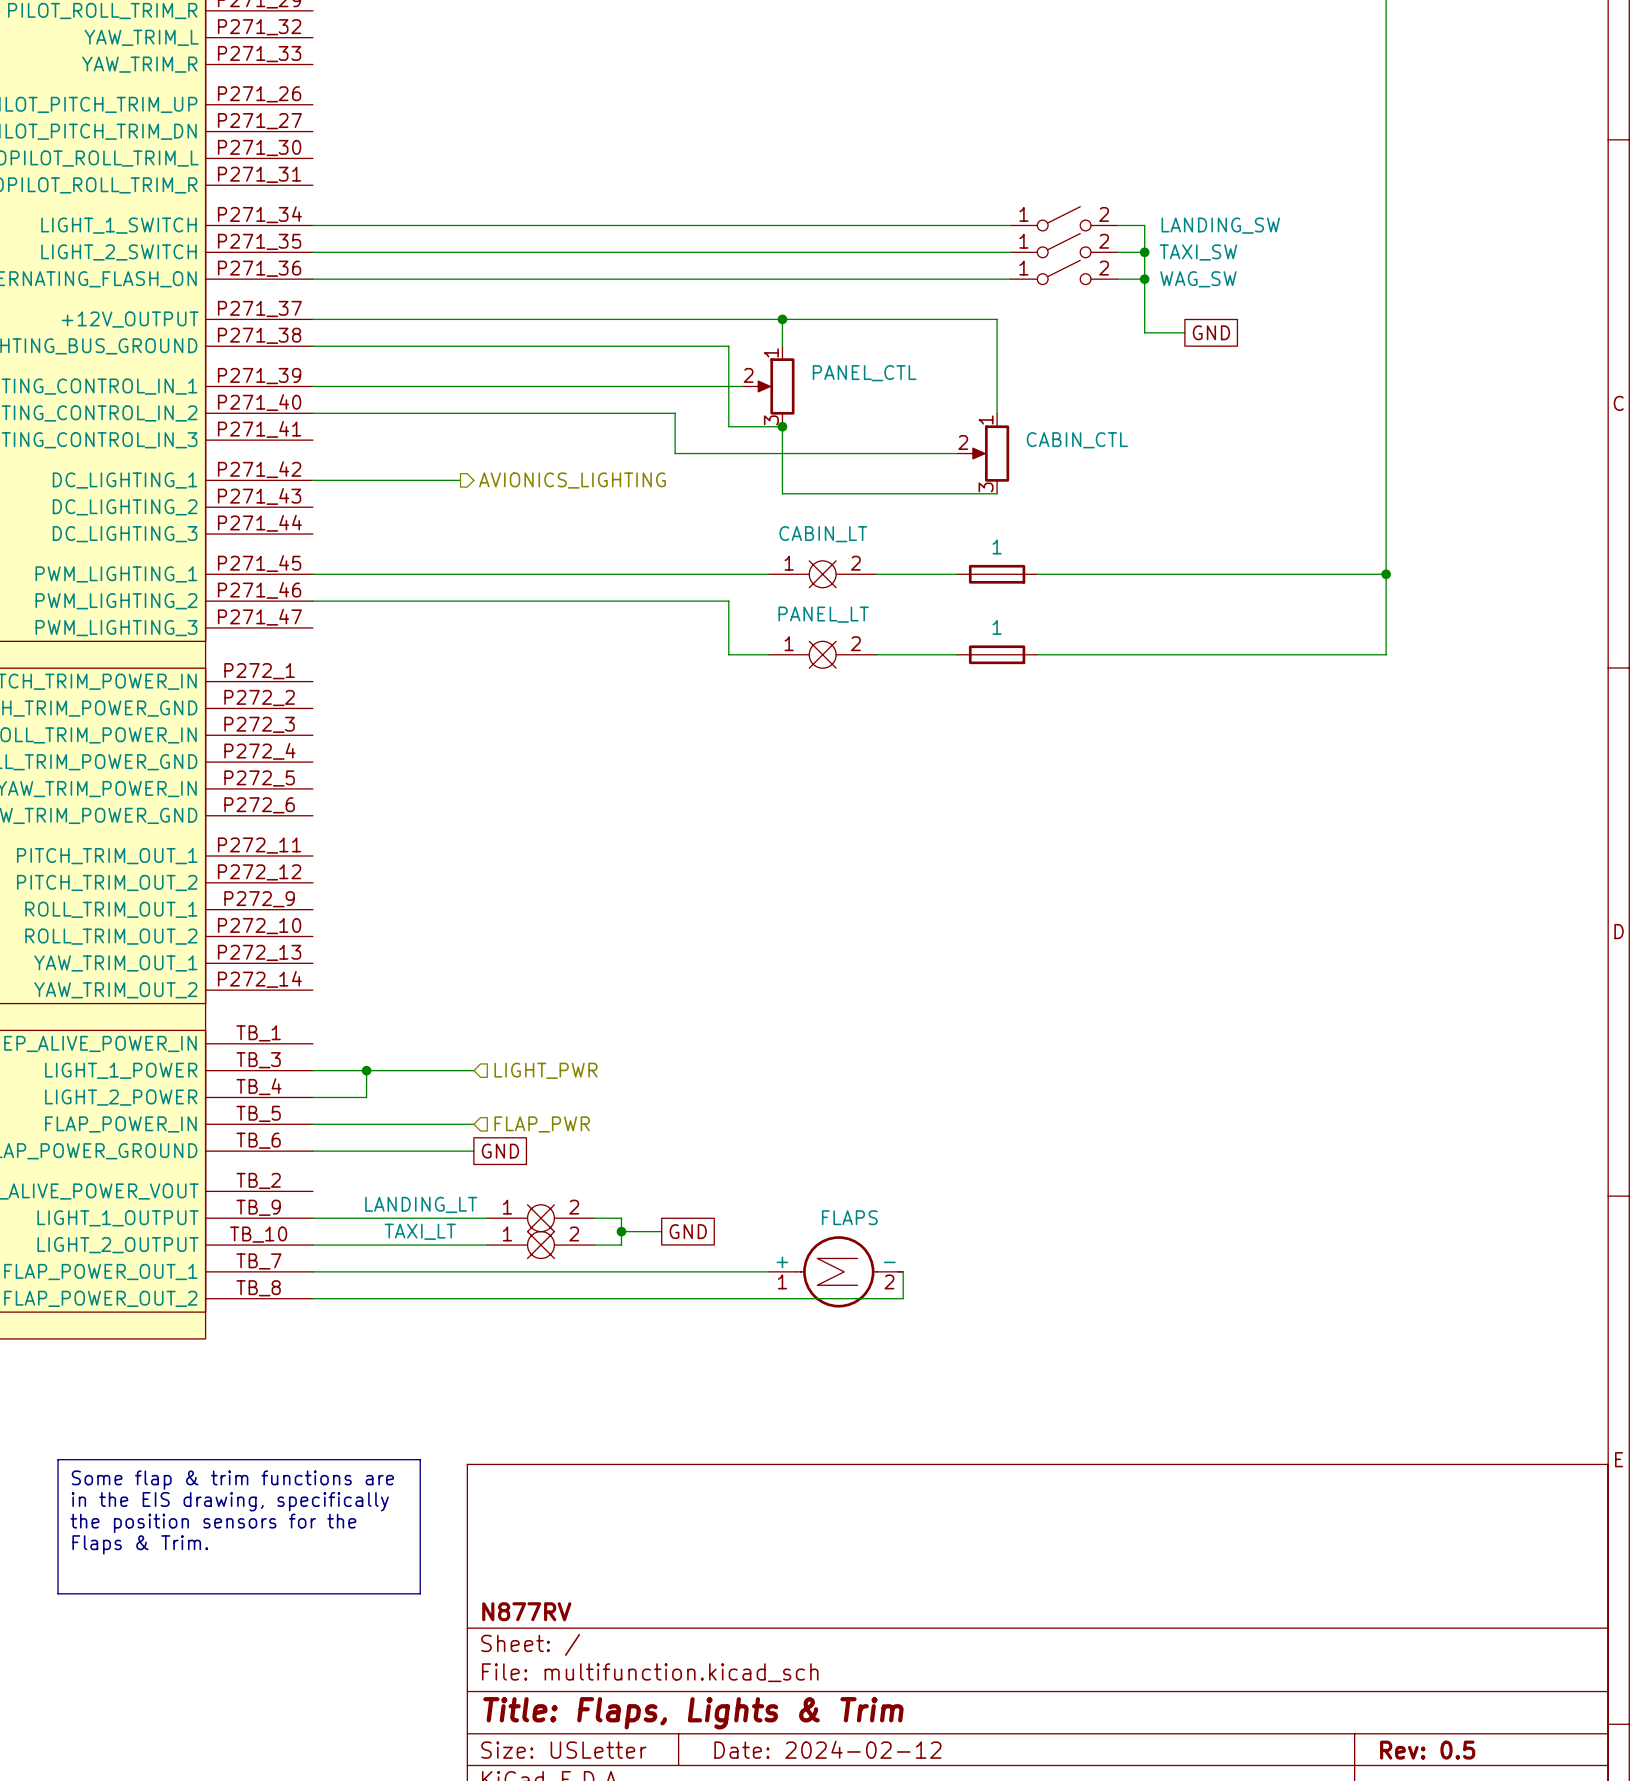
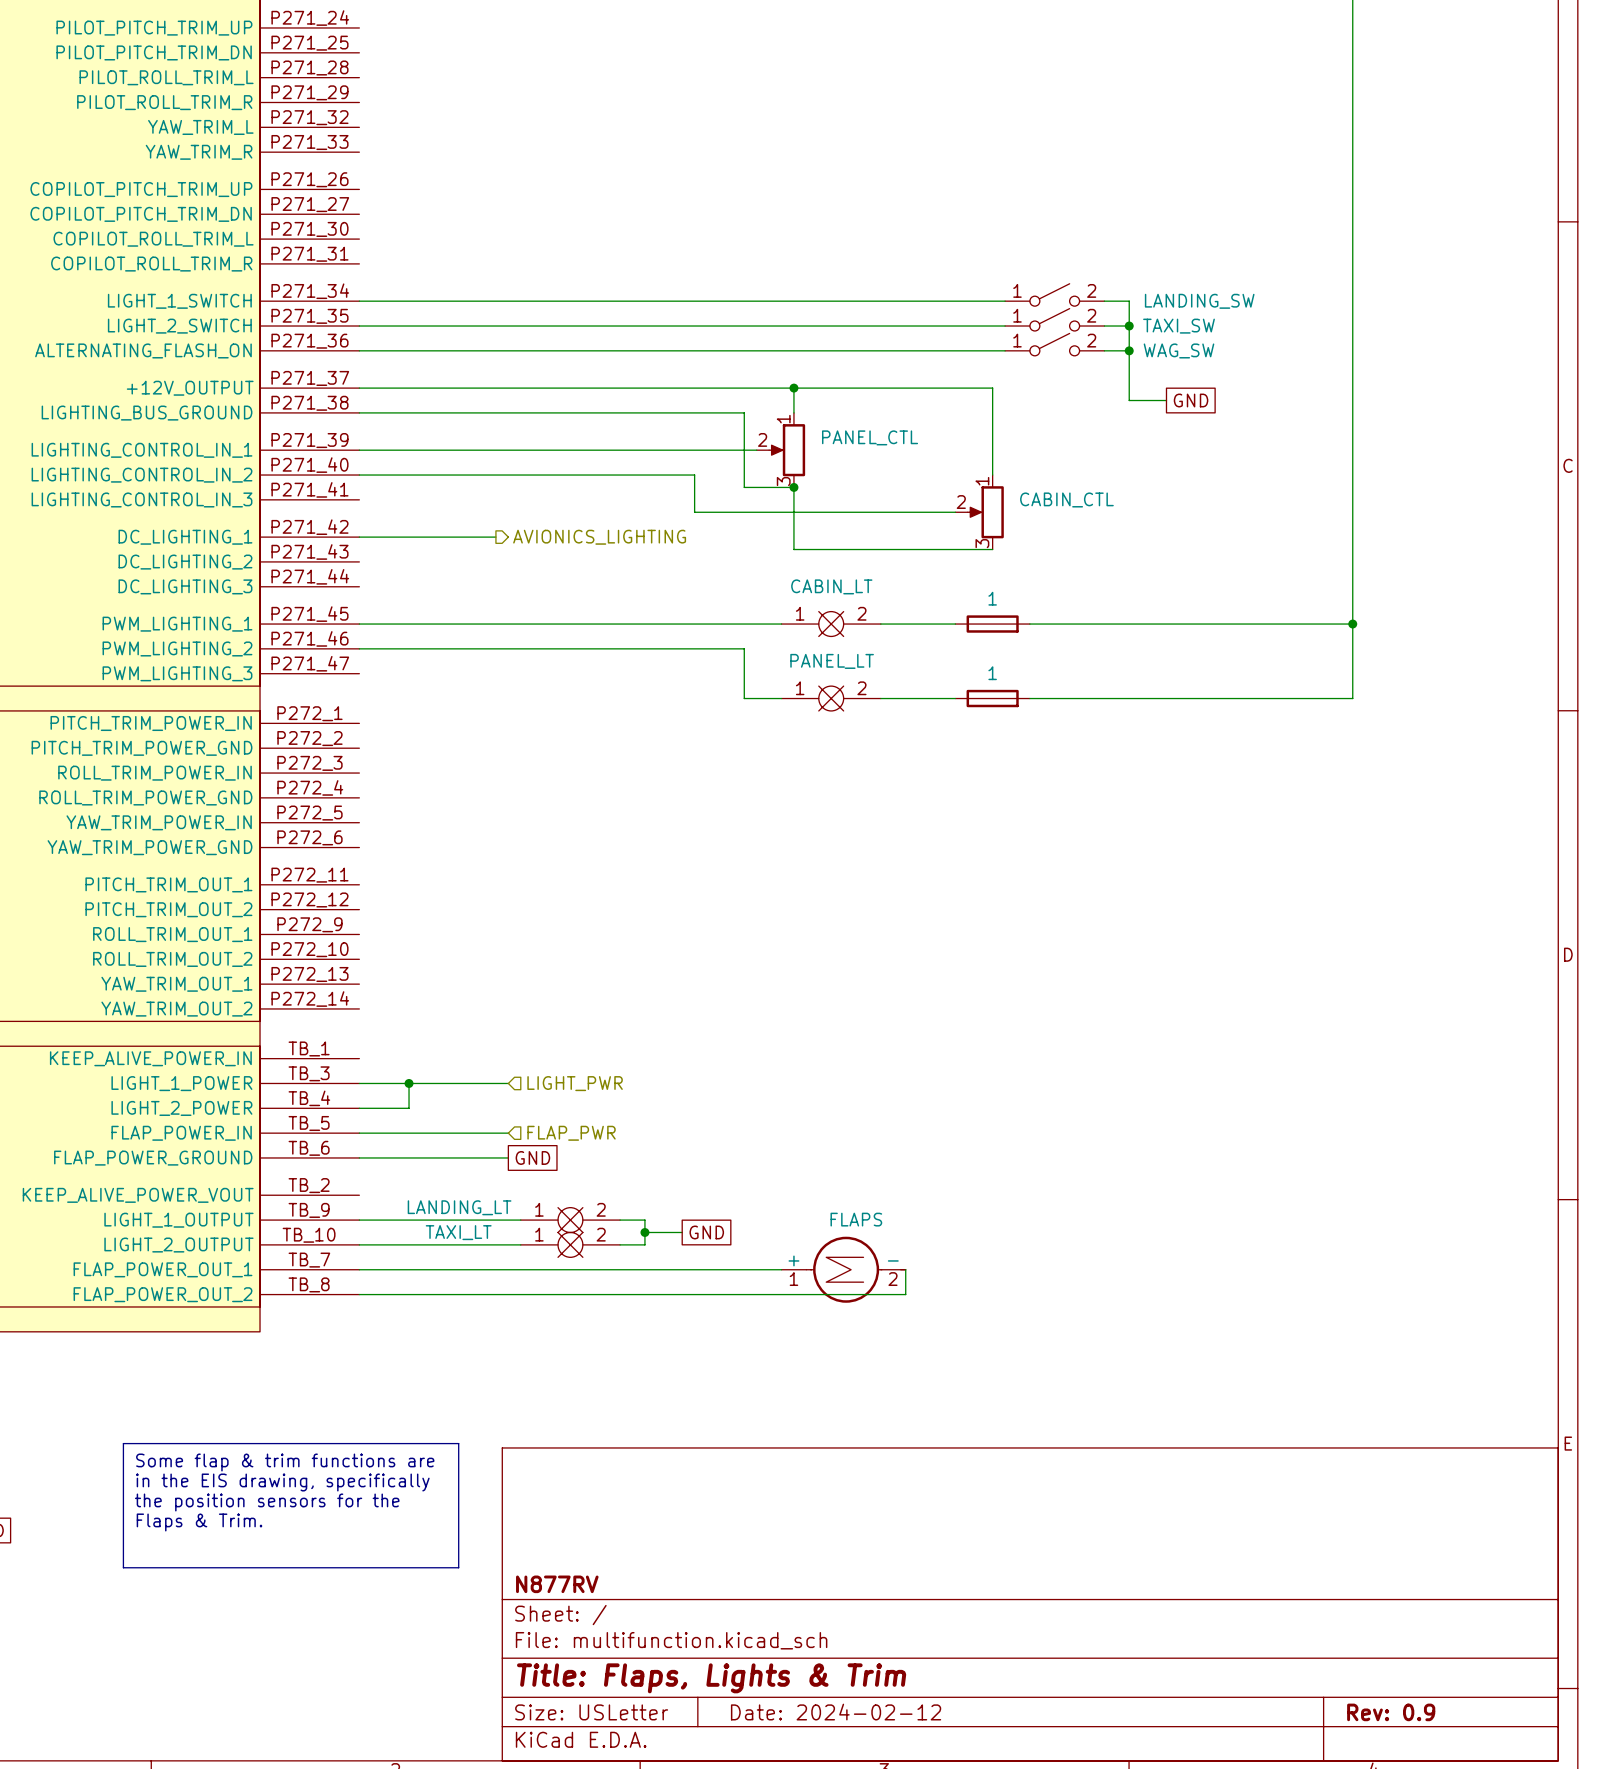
title block: Rev: 0.5 (1427, 1750) -> Rev: 0.9 (1391, 1712)

